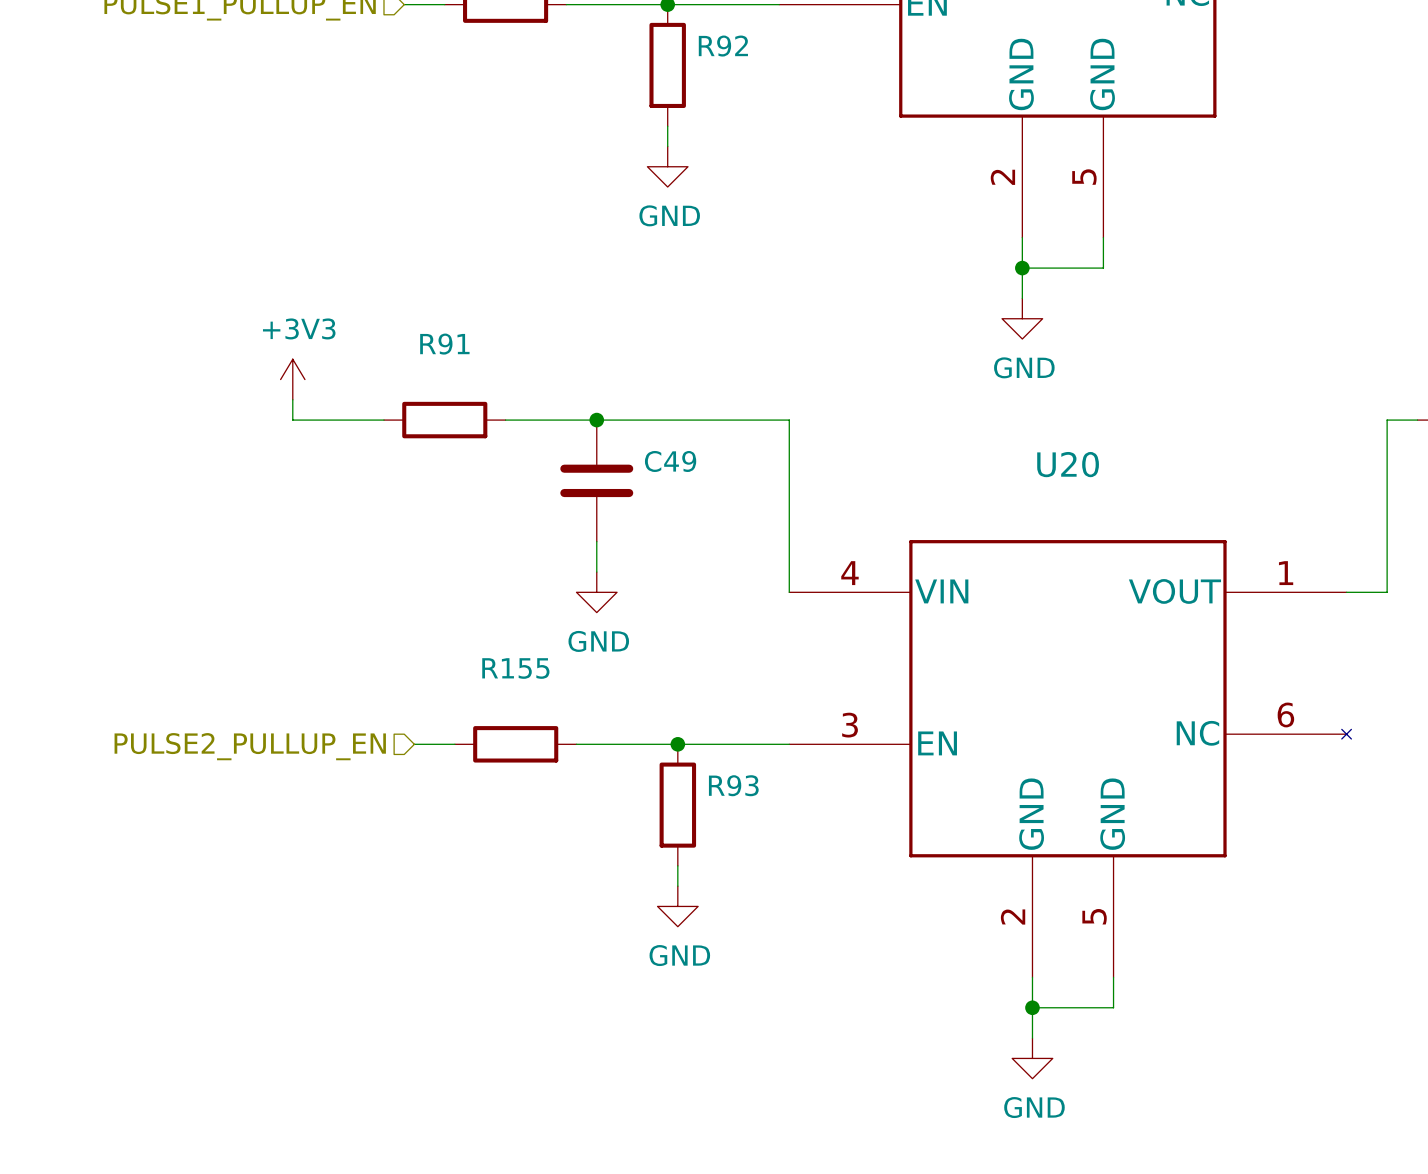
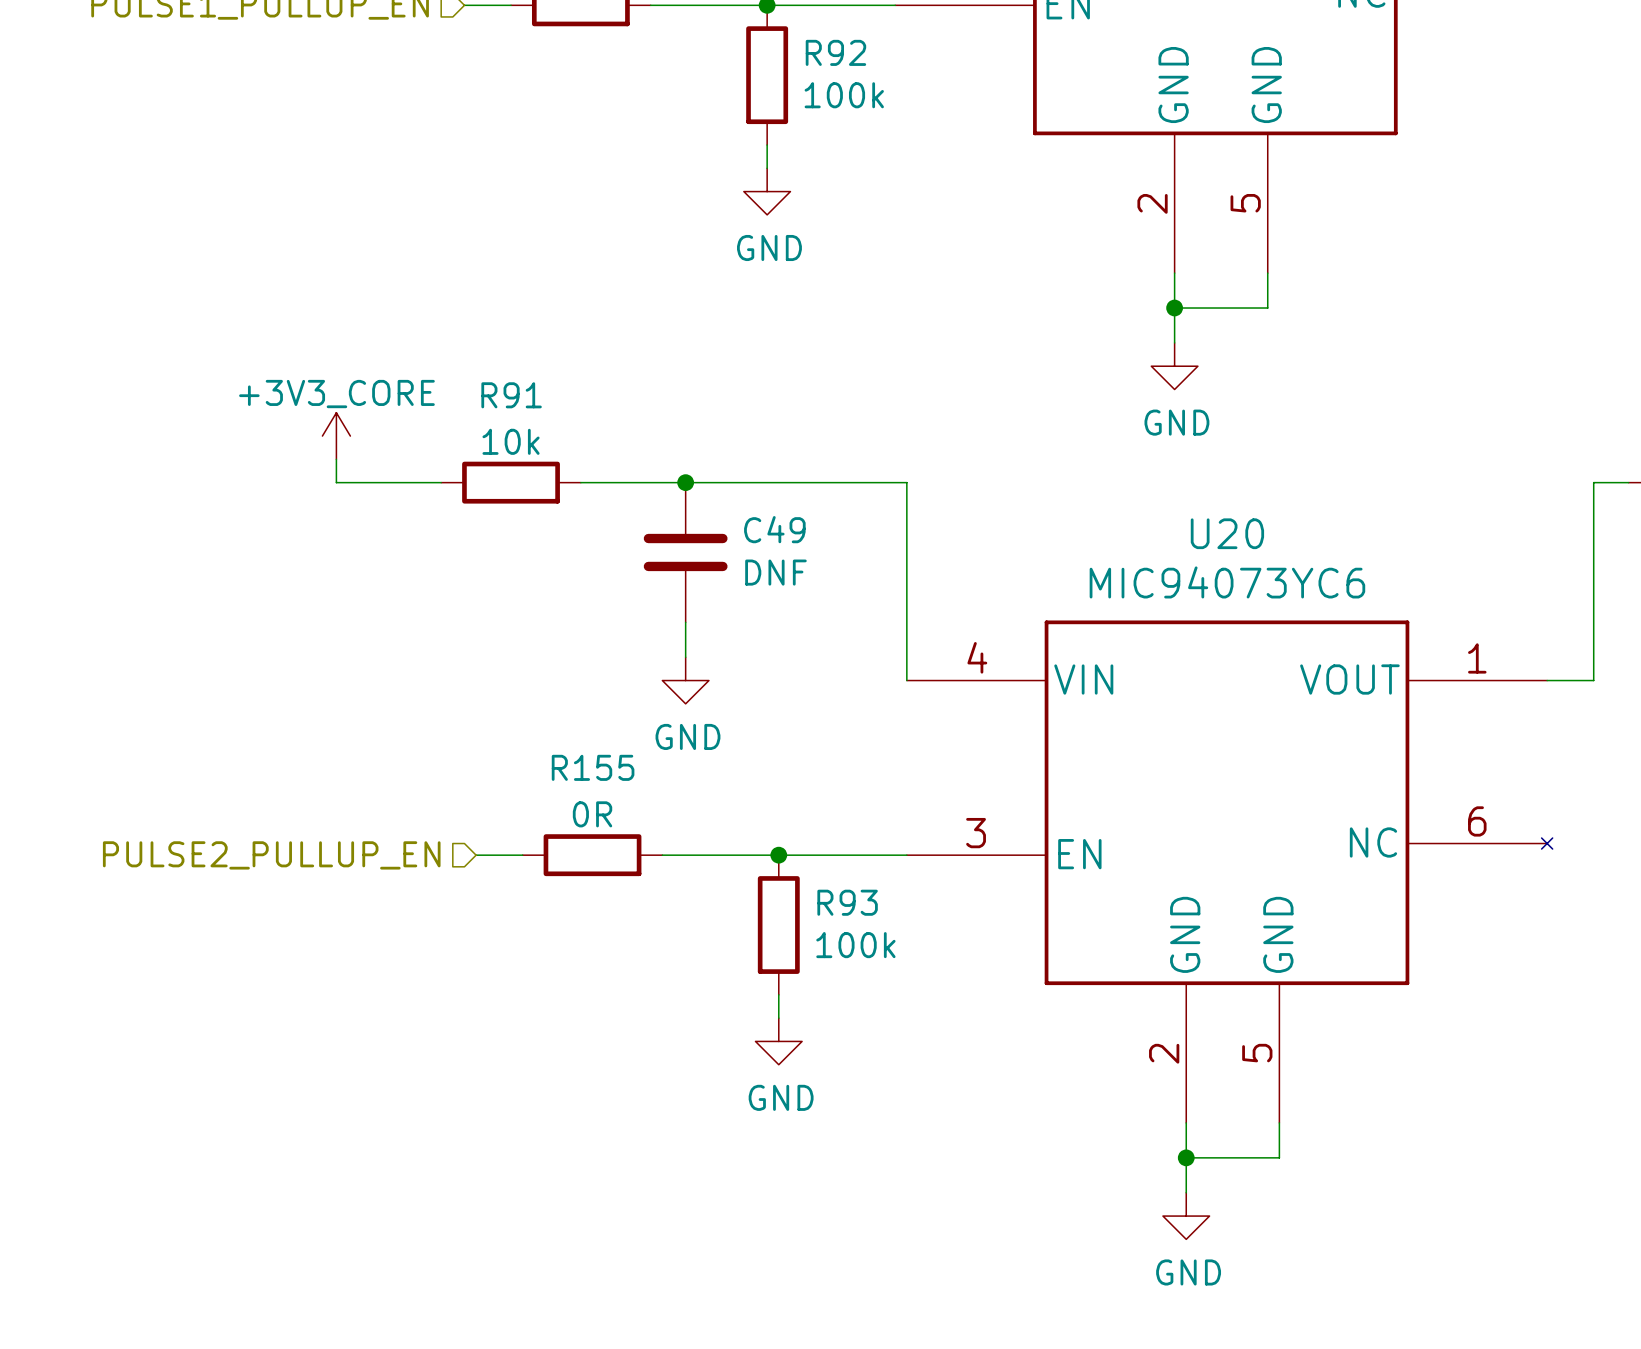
R92 value: none -> 100k (844, 95)
power symbol: +3V3 (292, 379) -> +3V3_CORE (336, 436)
R91 value: none -> 10k (511, 441)
C49 value: none -> DNF (775, 572)
U20 value: none -> MIC94073YC6 (1227, 582)
R155 value: none -> 0R (592, 814)
R93 value: none -> 100k (855, 945)

